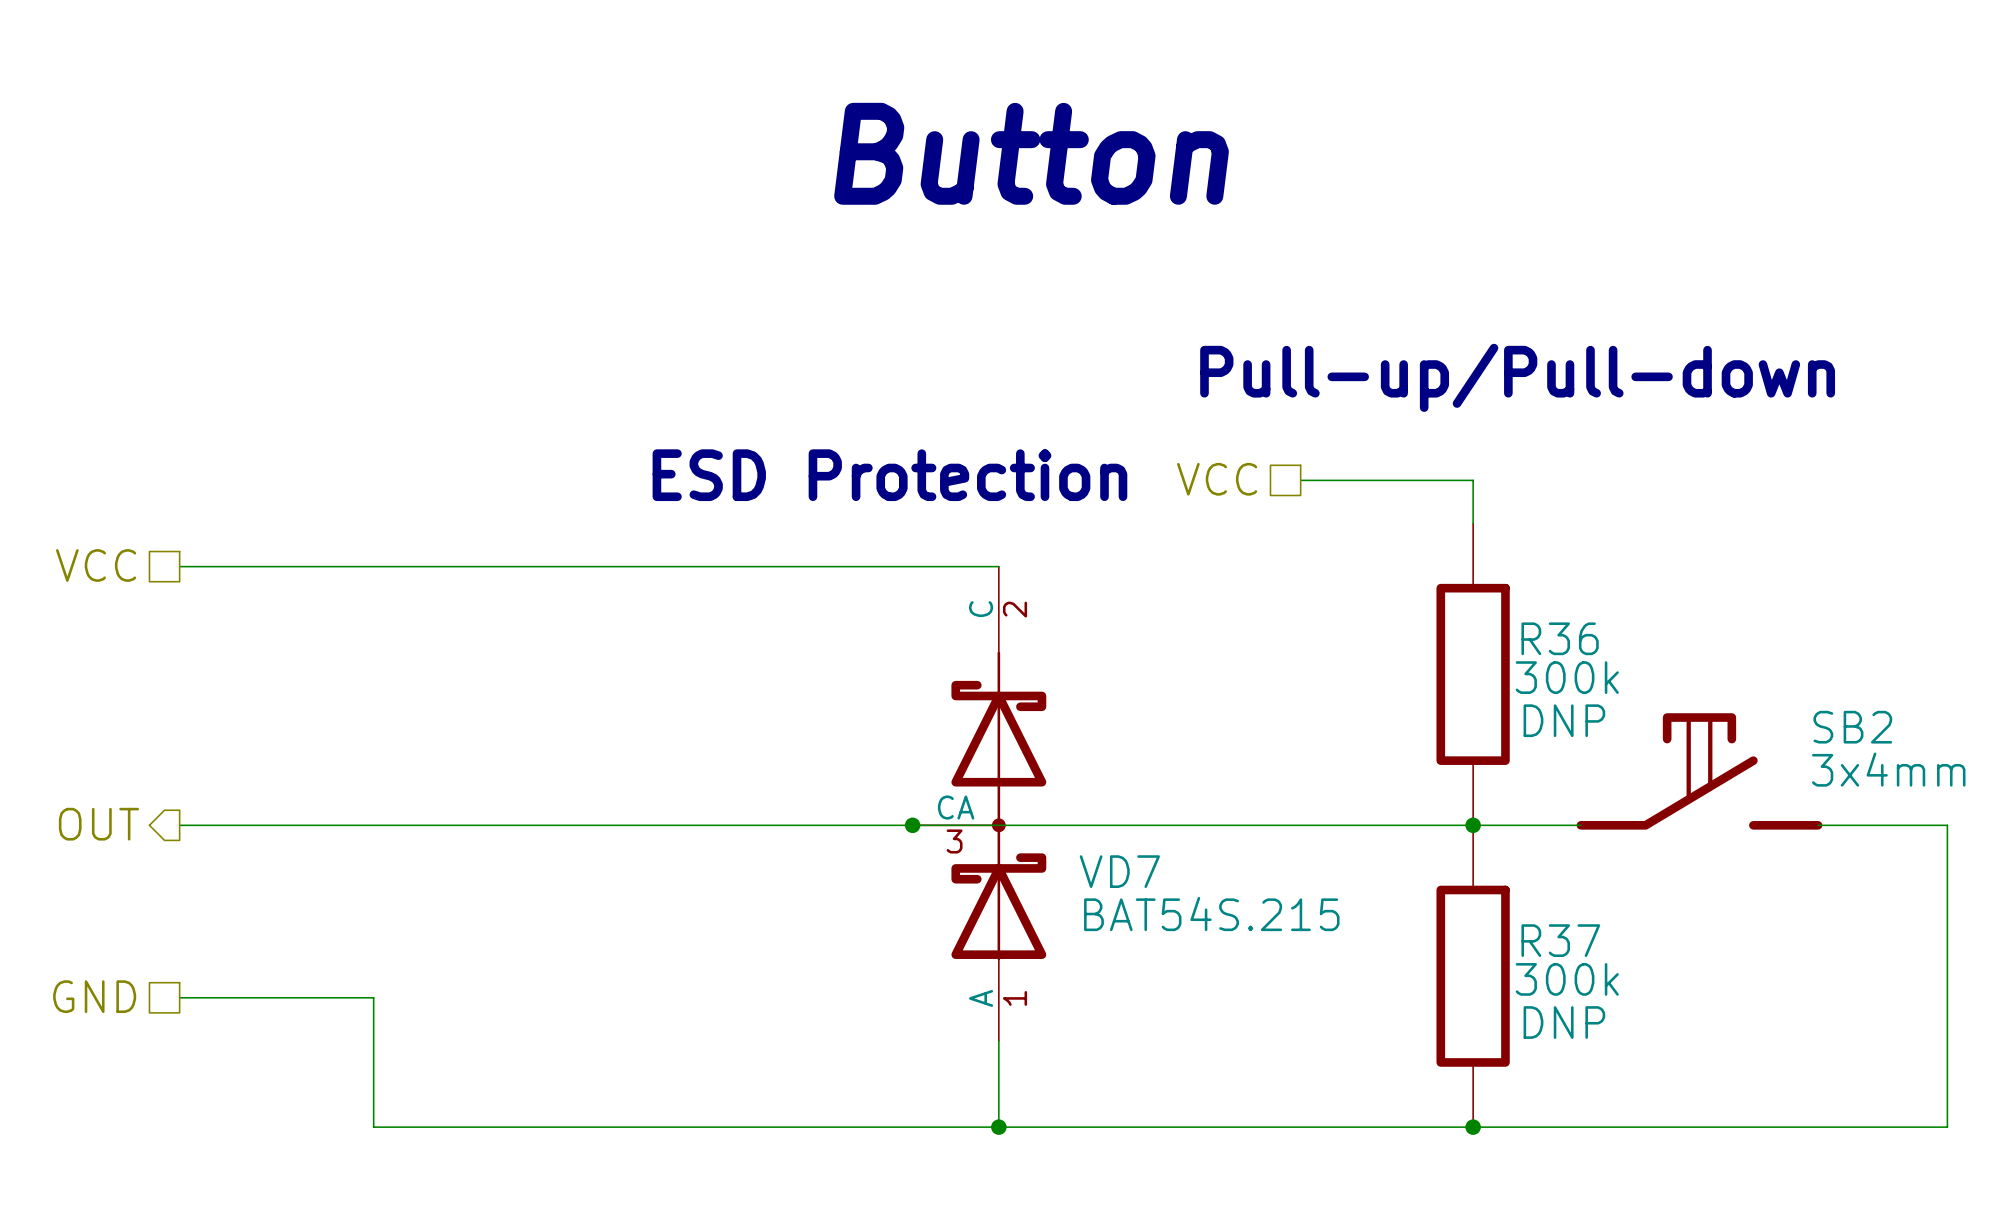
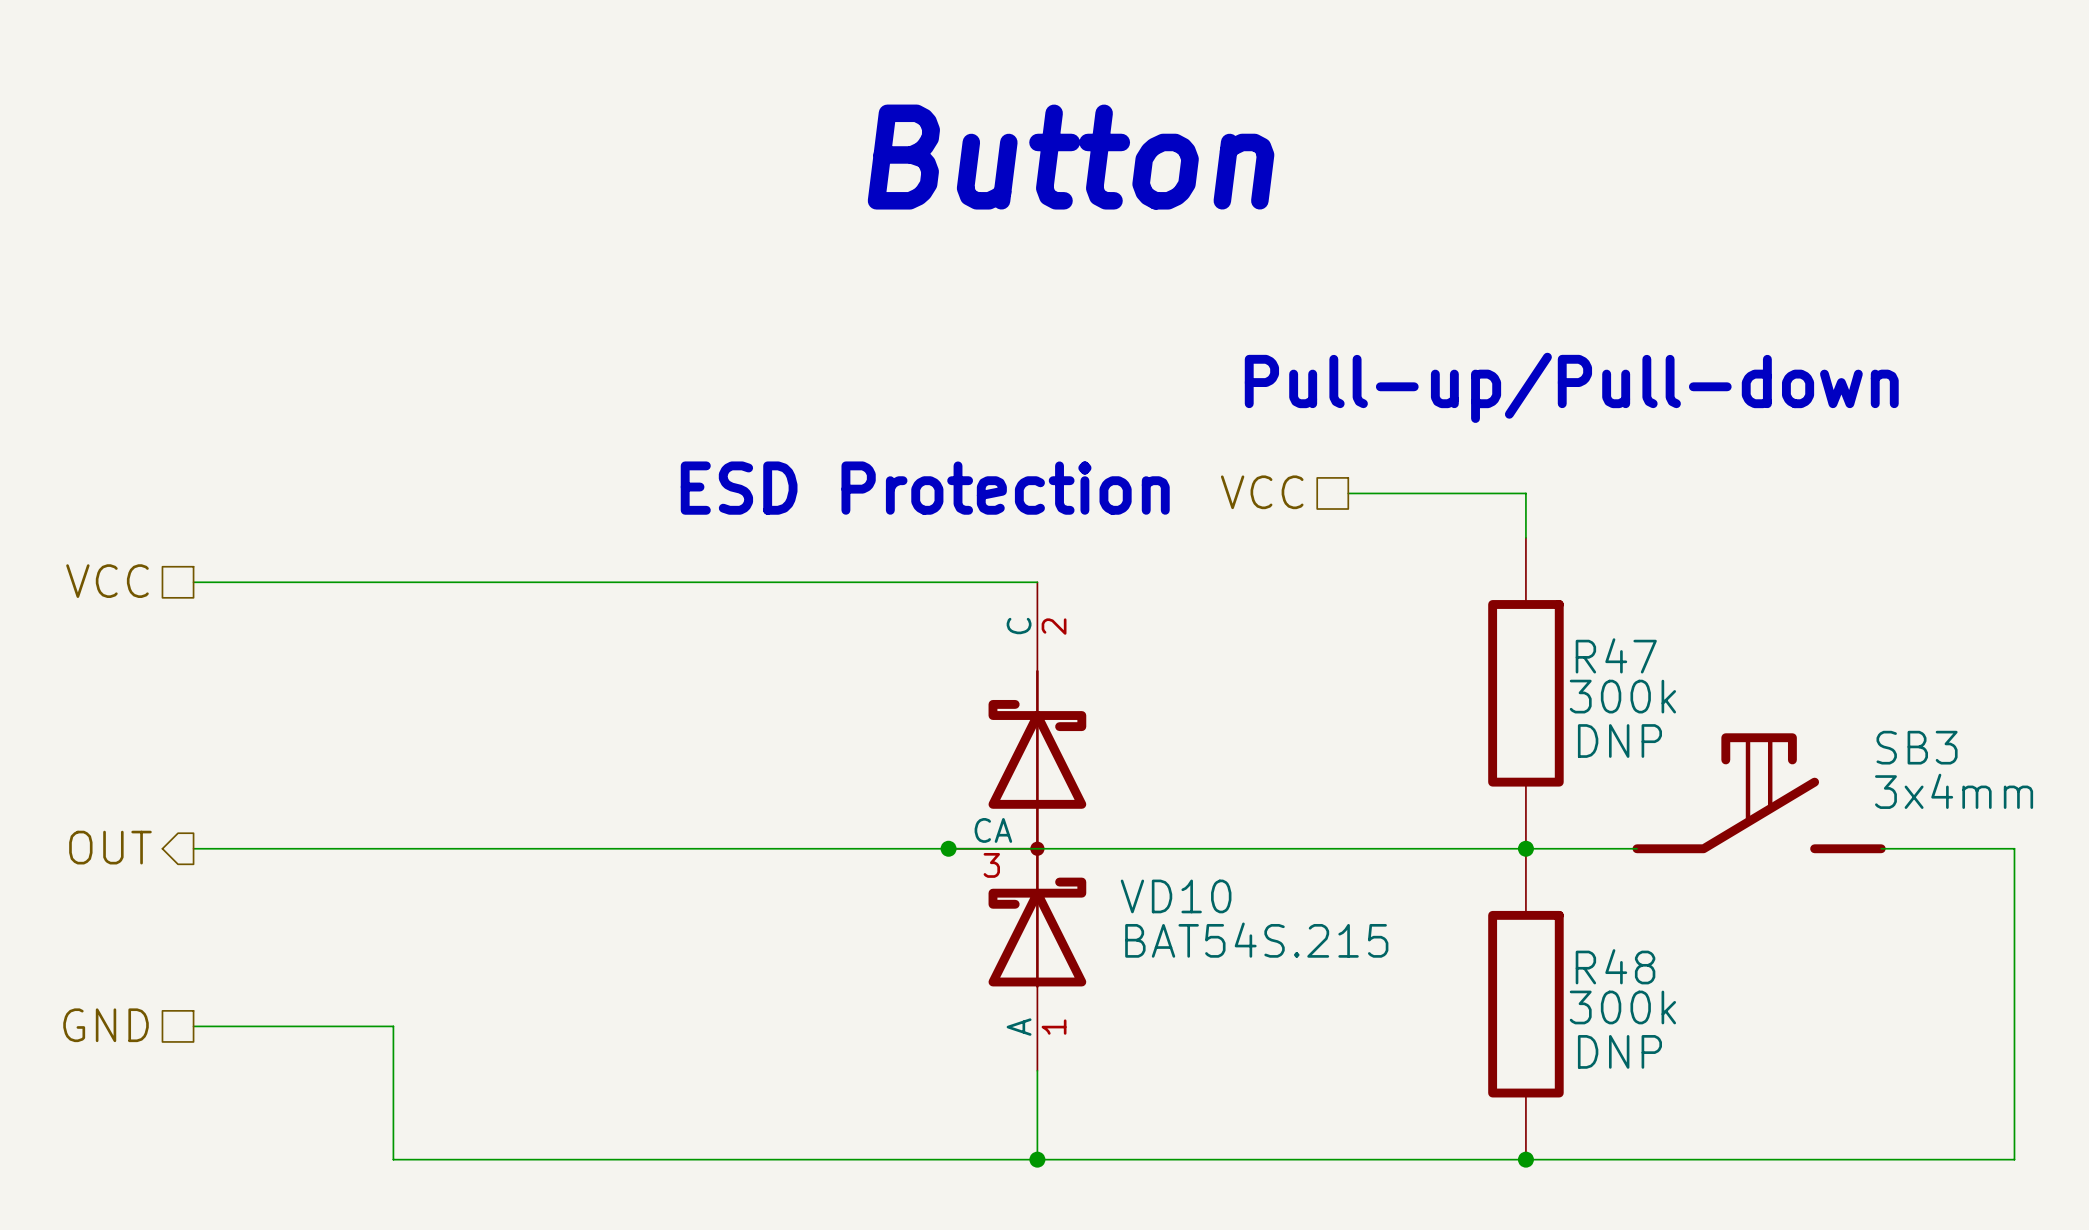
R36 name: R36 (1560, 638) -> R47 (1616, 655)
SB2 name: SB2 (1852, 727) -> SB3 (1917, 747)
VD7 name: VD7 (1119, 871) -> VD10 (1176, 896)
R37 name: R37 (1560, 940) -> R48 (1615, 966)

